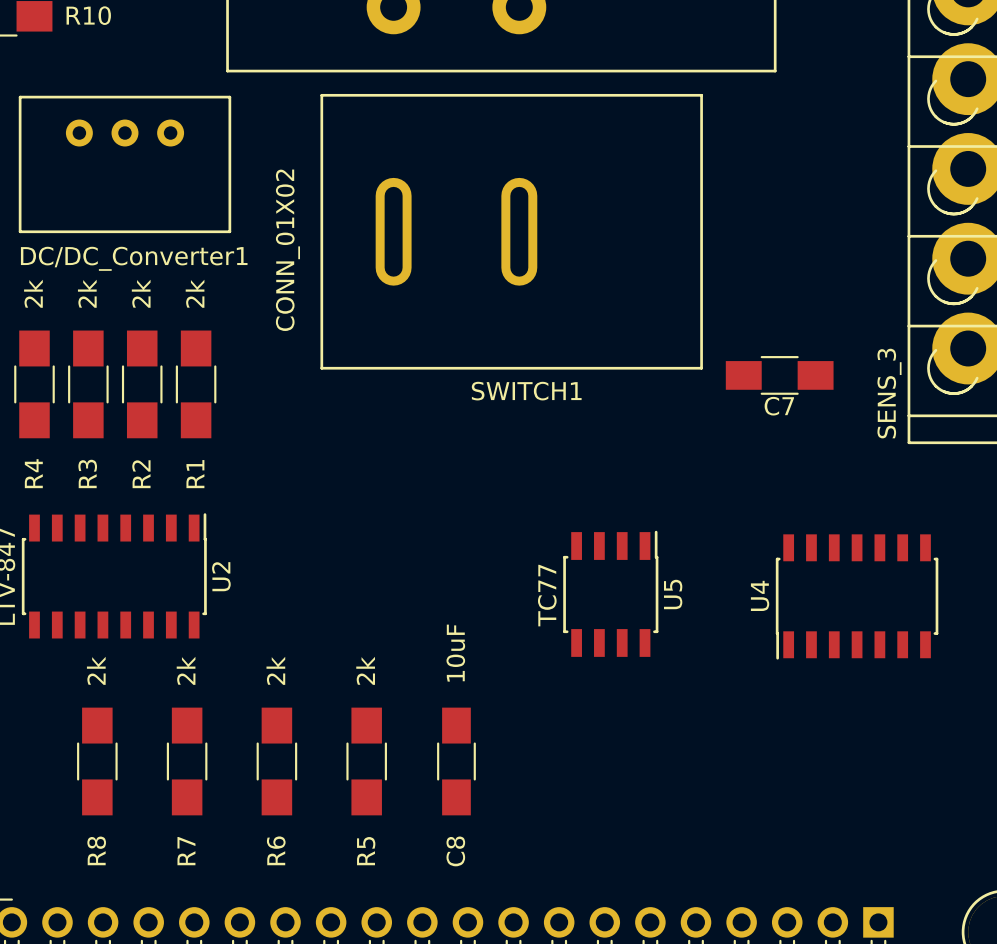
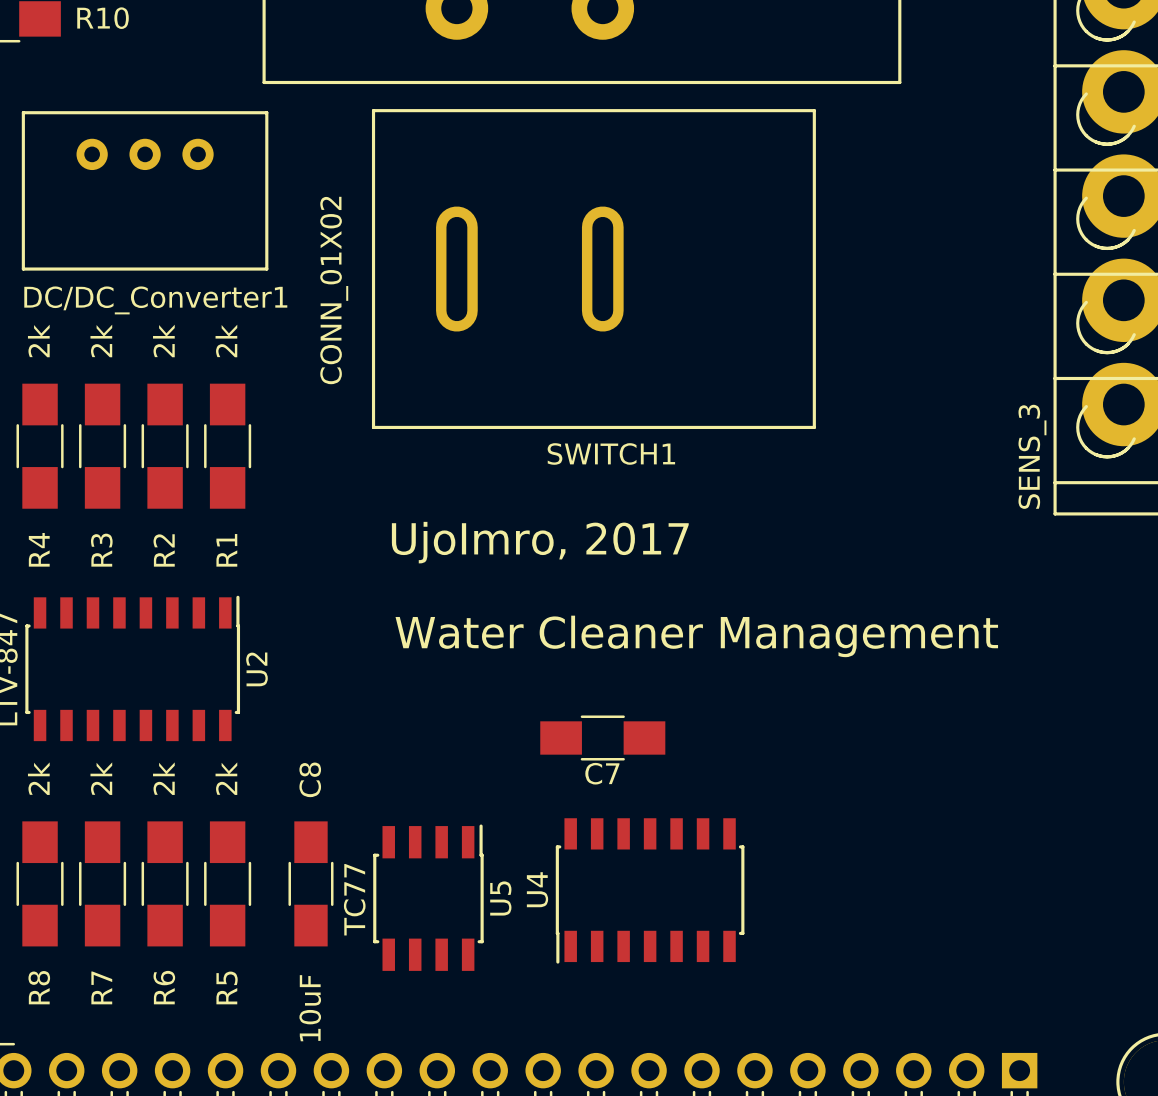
C7 position: (779, 375) -> (602, 737)
text: none -> UjoImro, 2017 (540, 542)
text: none -> Water Cleaner Management (696, 636)
U5 position: (610, 593) -> (428, 897)
U4 position: (857, 596) -> (650, 890)
C8 value position: 10uF (455, 653) -> 10uF (310, 1008)
R8 position: (97, 761) -> (40, 883)
R7 position: (187, 761) -> (102, 883)
R6 position: (276, 761) -> (165, 883)
R5 position: (366, 761) -> (227, 883)
C8 position: (456, 761) -> (310, 883)
C8 name position: C8 (455, 851) -> C8 (310, 779)

